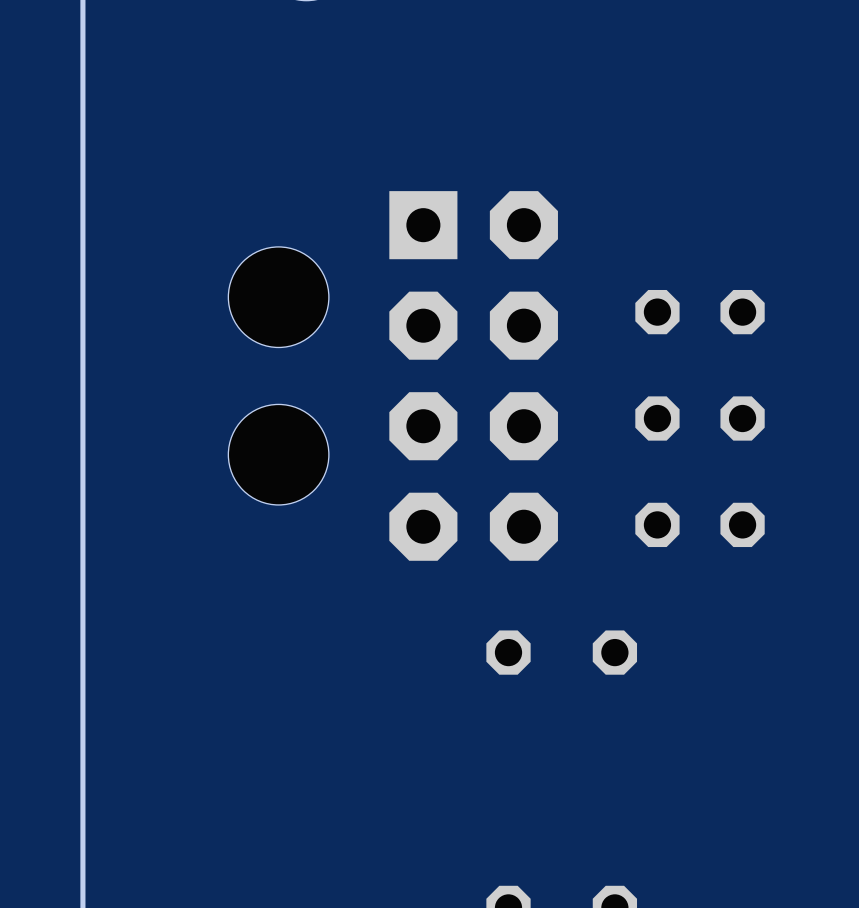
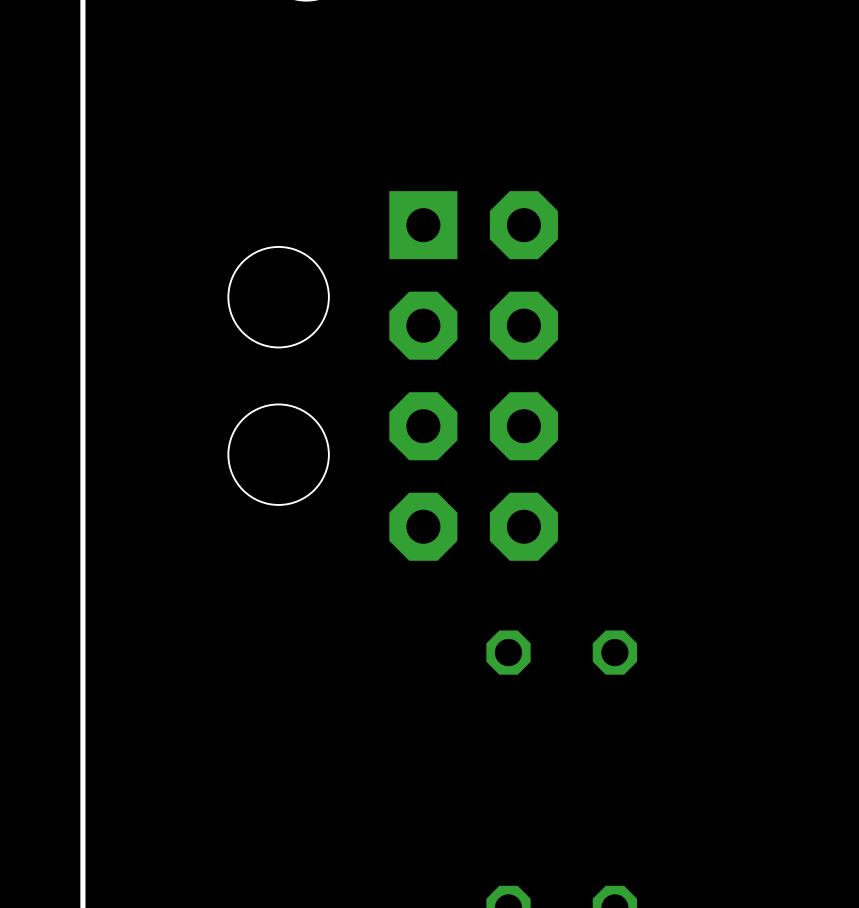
part: (700, 312) -> none
part: (700, 418) -> none
part: (700, 524) -> none

